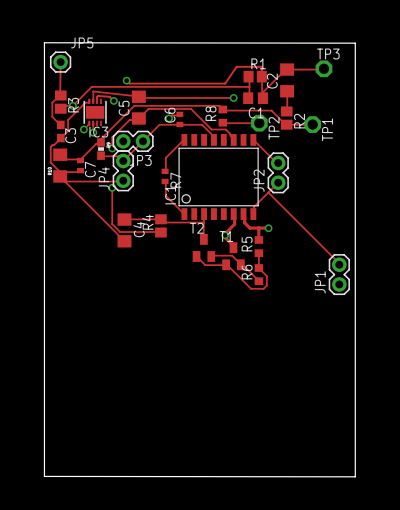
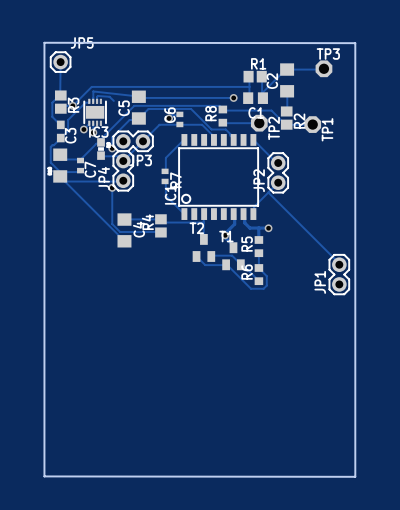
track: (261, 76) (261, 66) (236, 66) (225, 83) (129, 83) (126, 80) -> none
via: (126, 80) -> none
via: (113, 100) -> none

